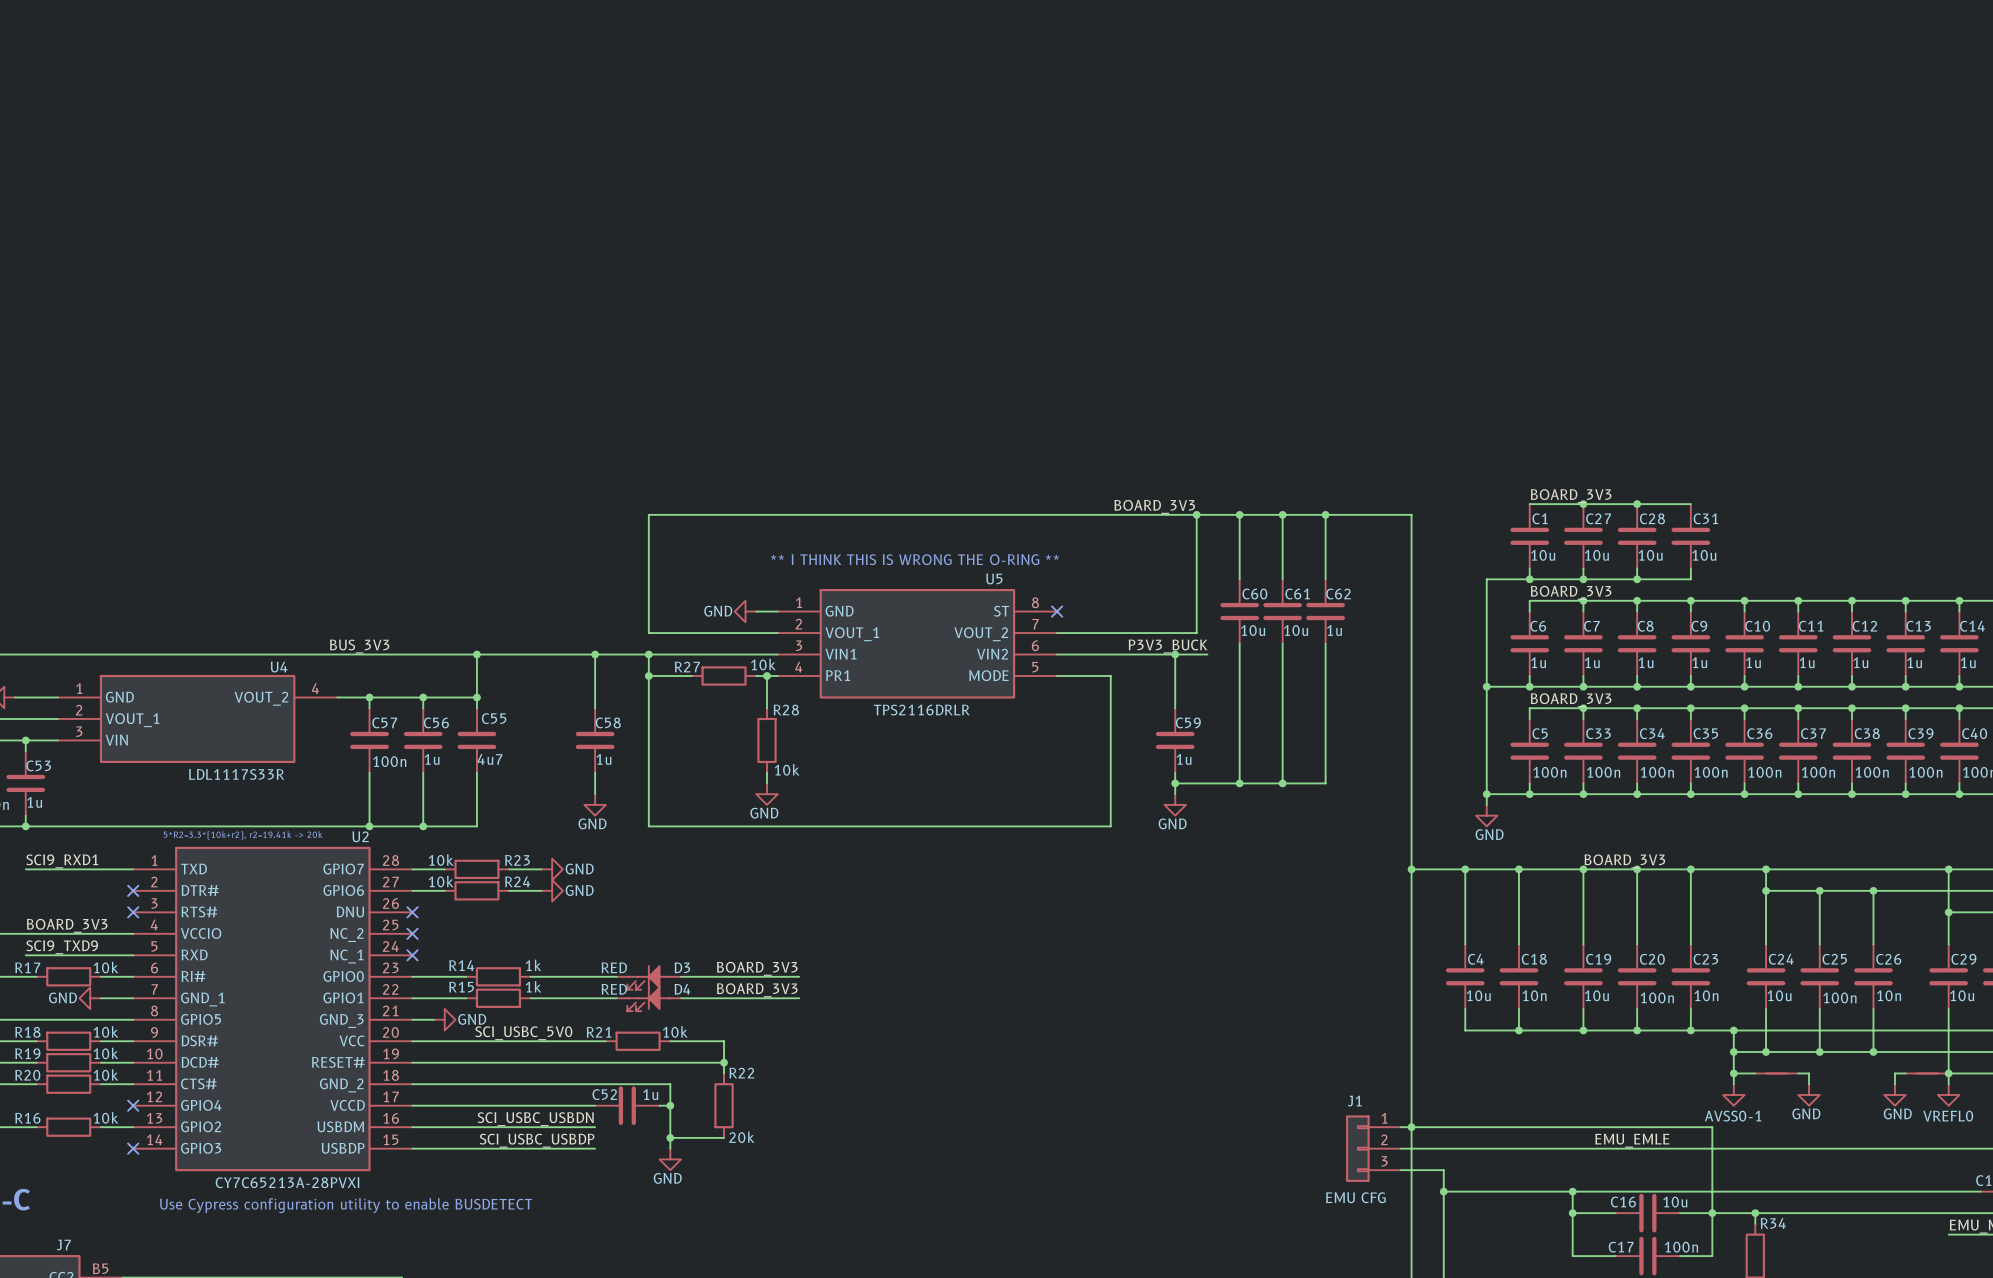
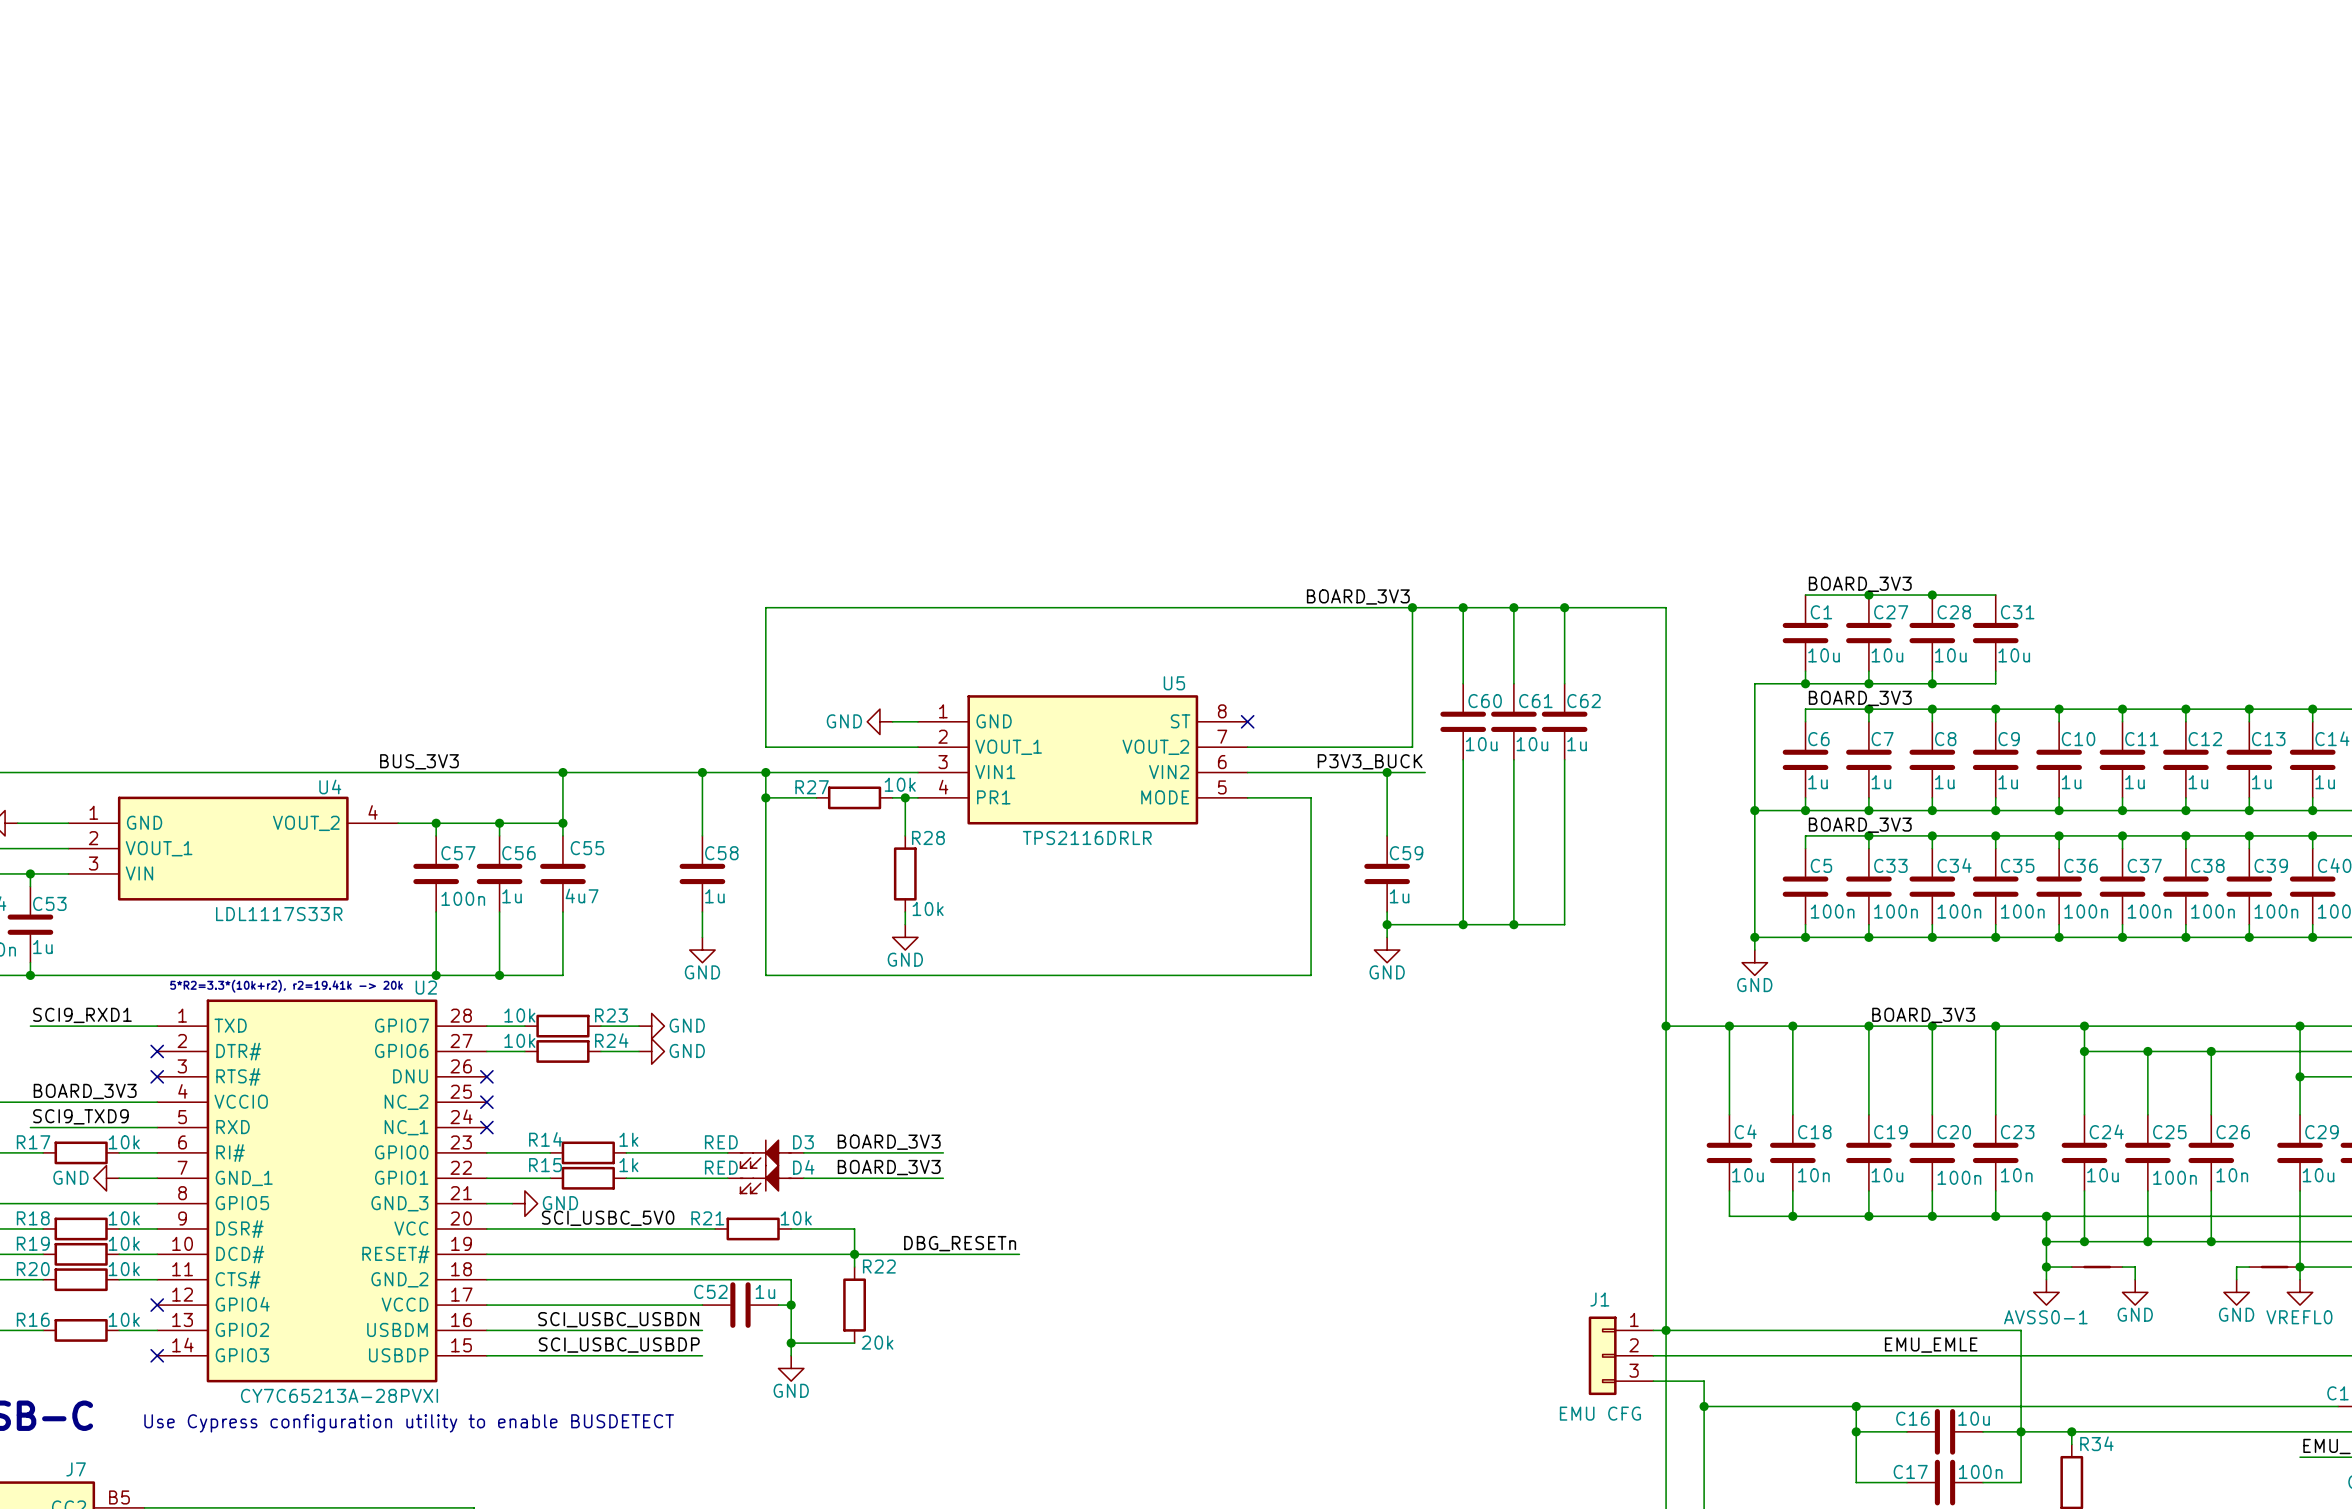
text: ** I THINK THIS IS WRONG THE O-RING ** (914, 559) -> none
label: none -> DBG_RESETn (960, 1243)
wire: none -> (854, 1254) (1019, 1254)

